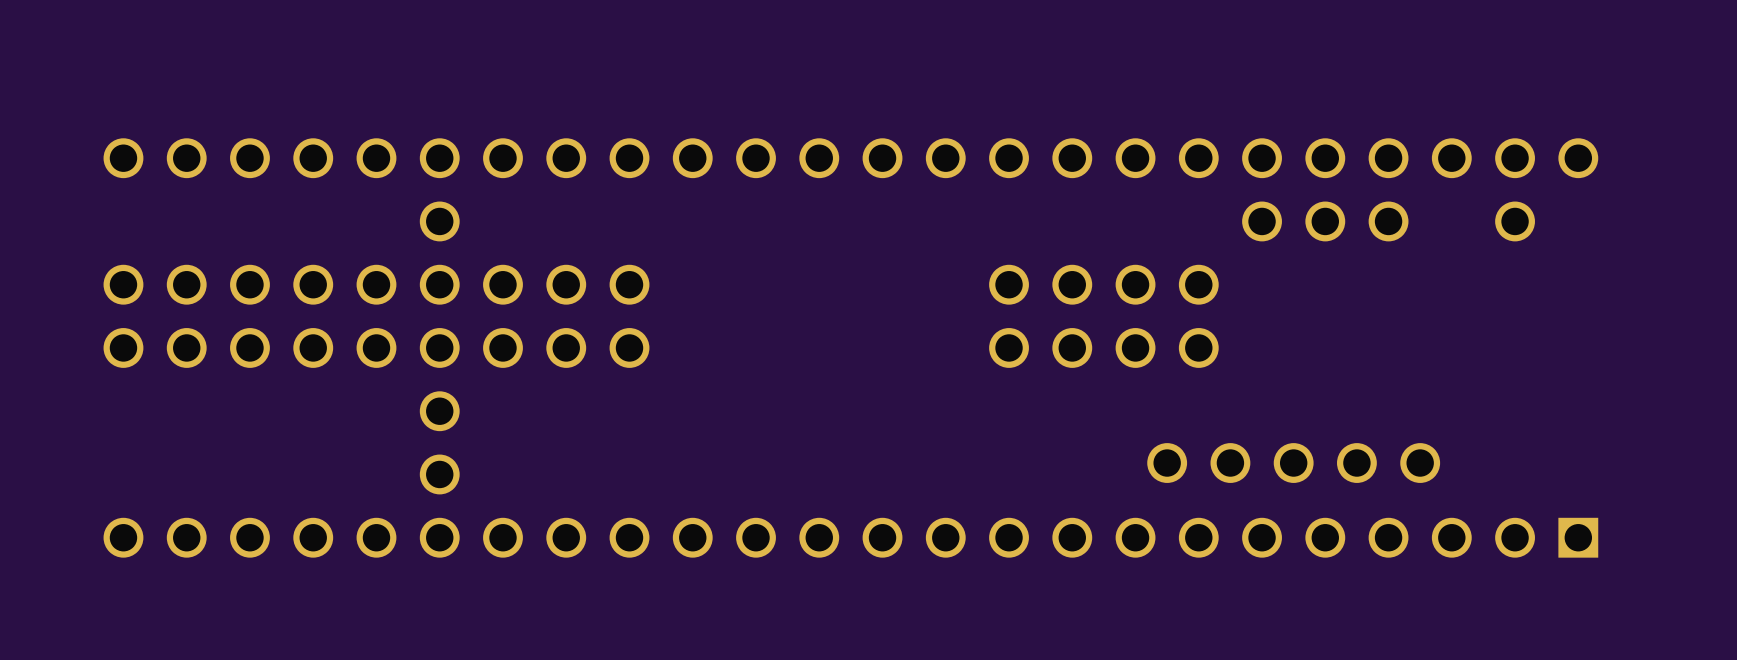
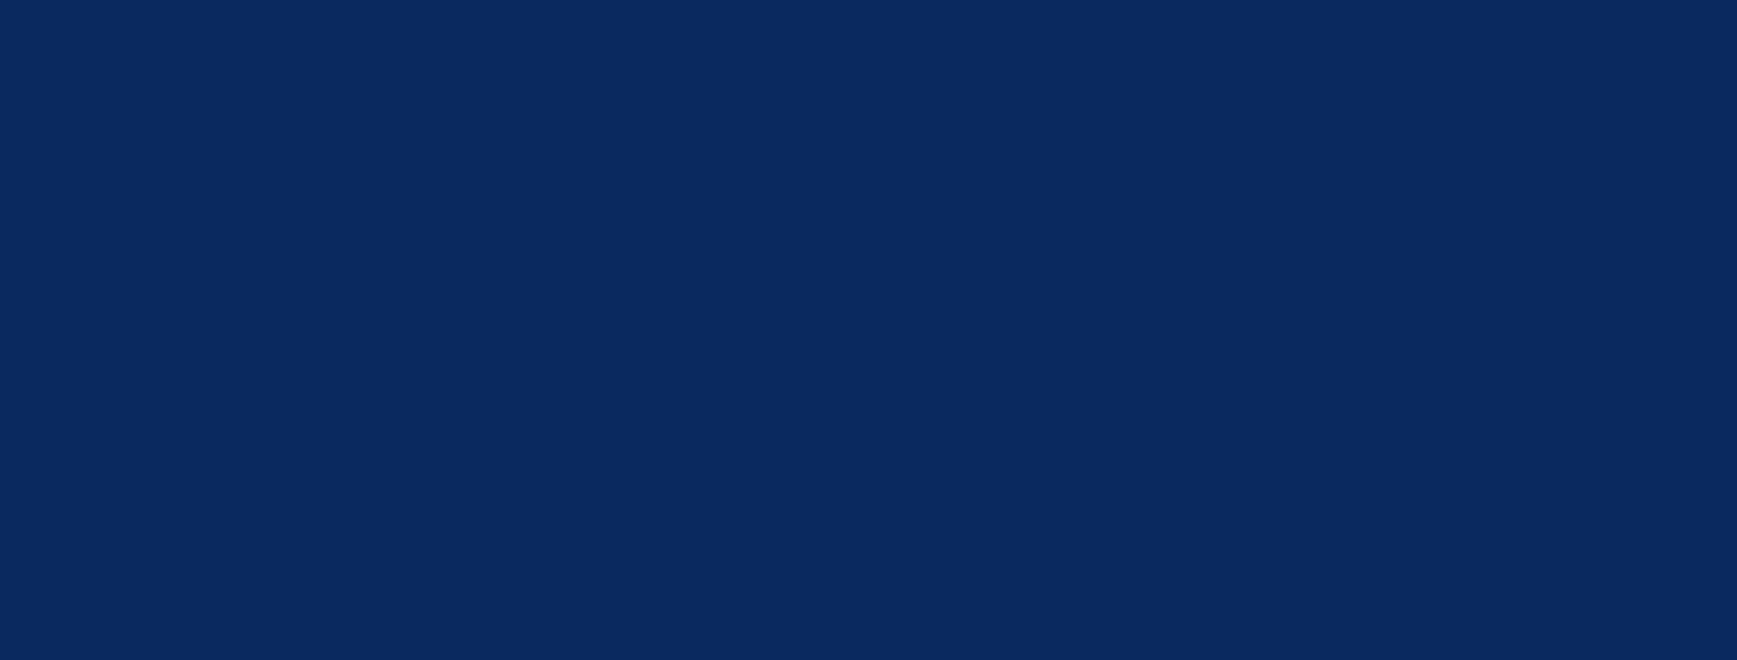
part: (850, 347) -> none

